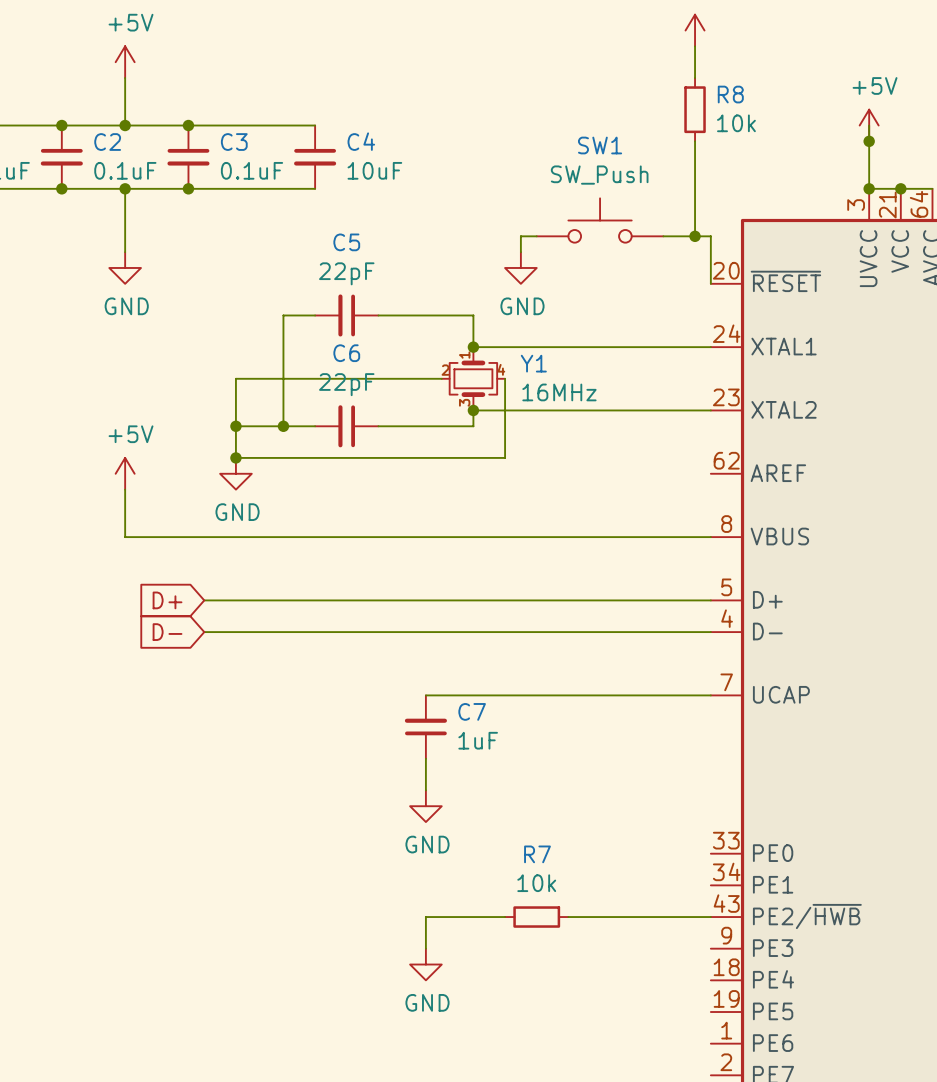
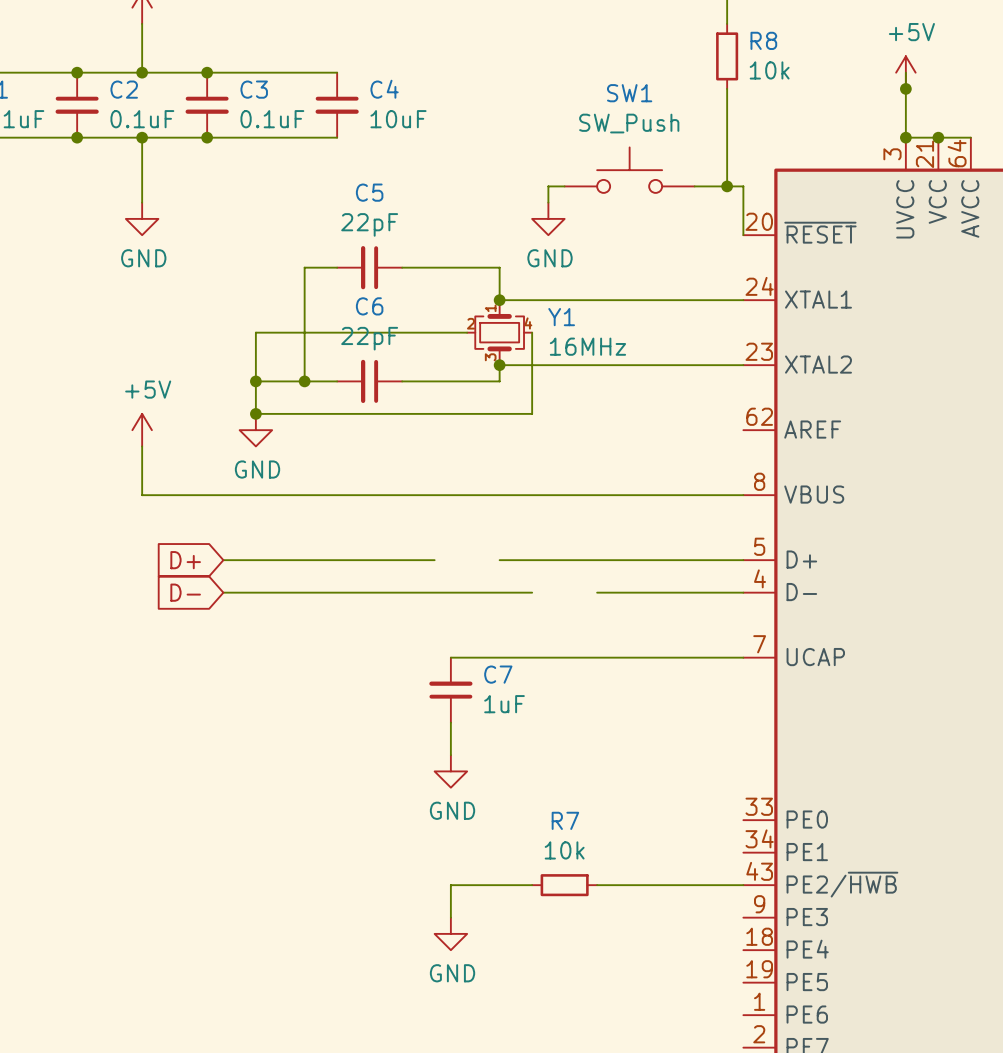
wire: (410, 600) (473, 600) -> none
wire: (505, 632) (568, 632) -> none

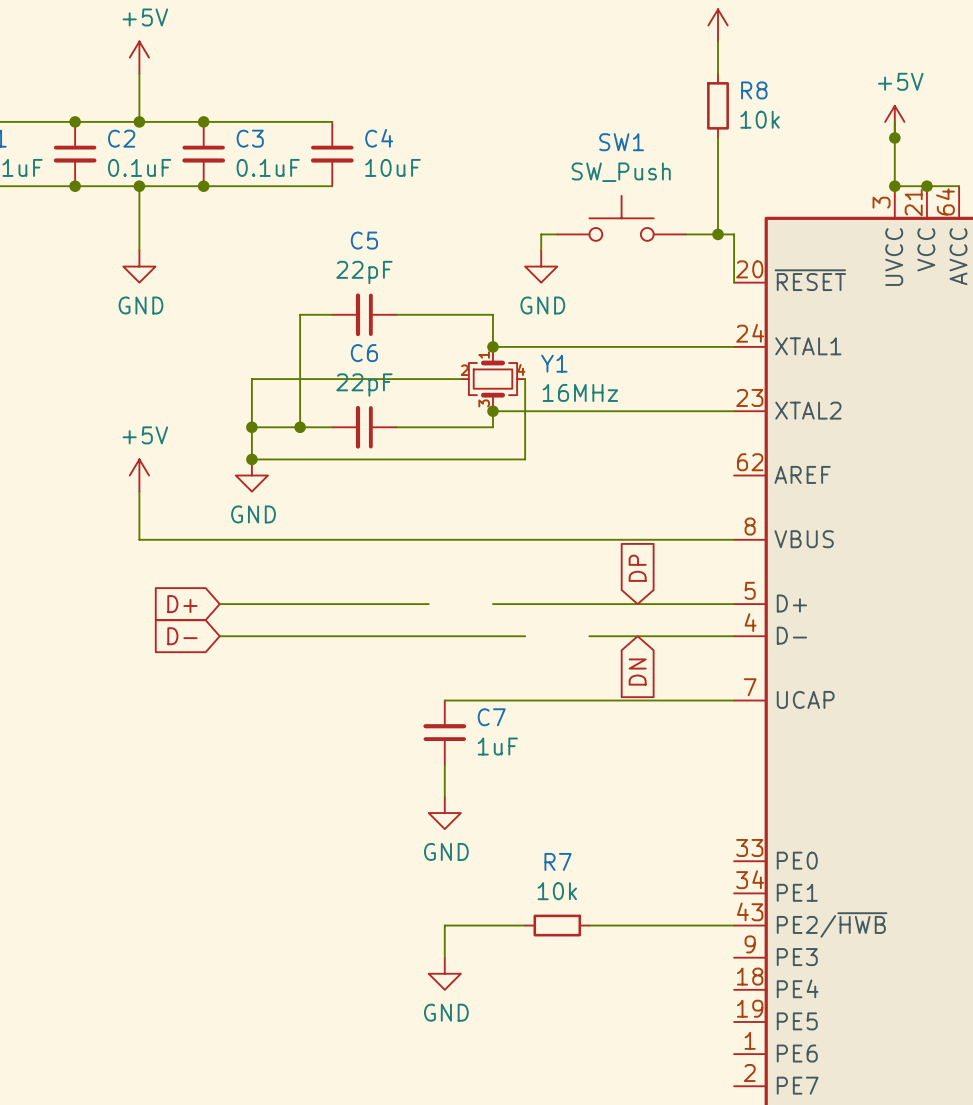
global label: none -> DP (637, 568)
global label: none -> DN (637, 672)

